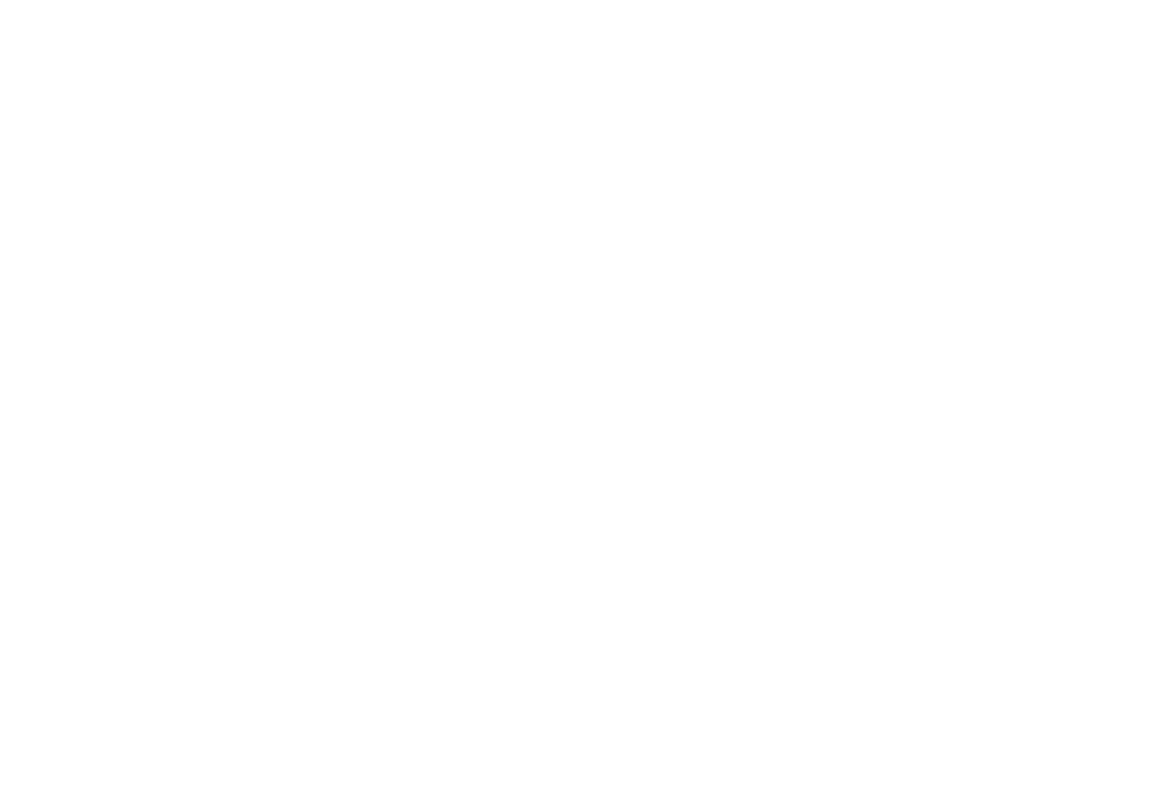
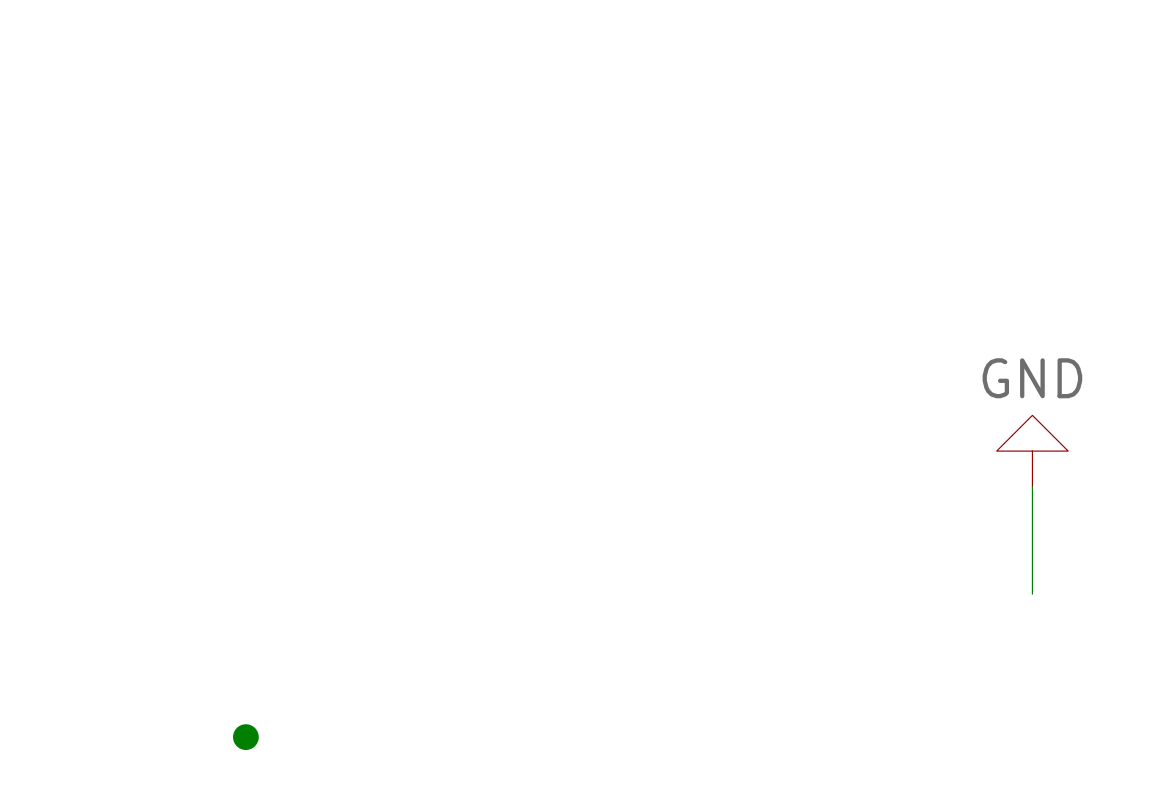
power symbol: none -> GND (1032, 451)
wire: none -> (1032, 486) (1032, 594)
junction: none -> (245, 737)

